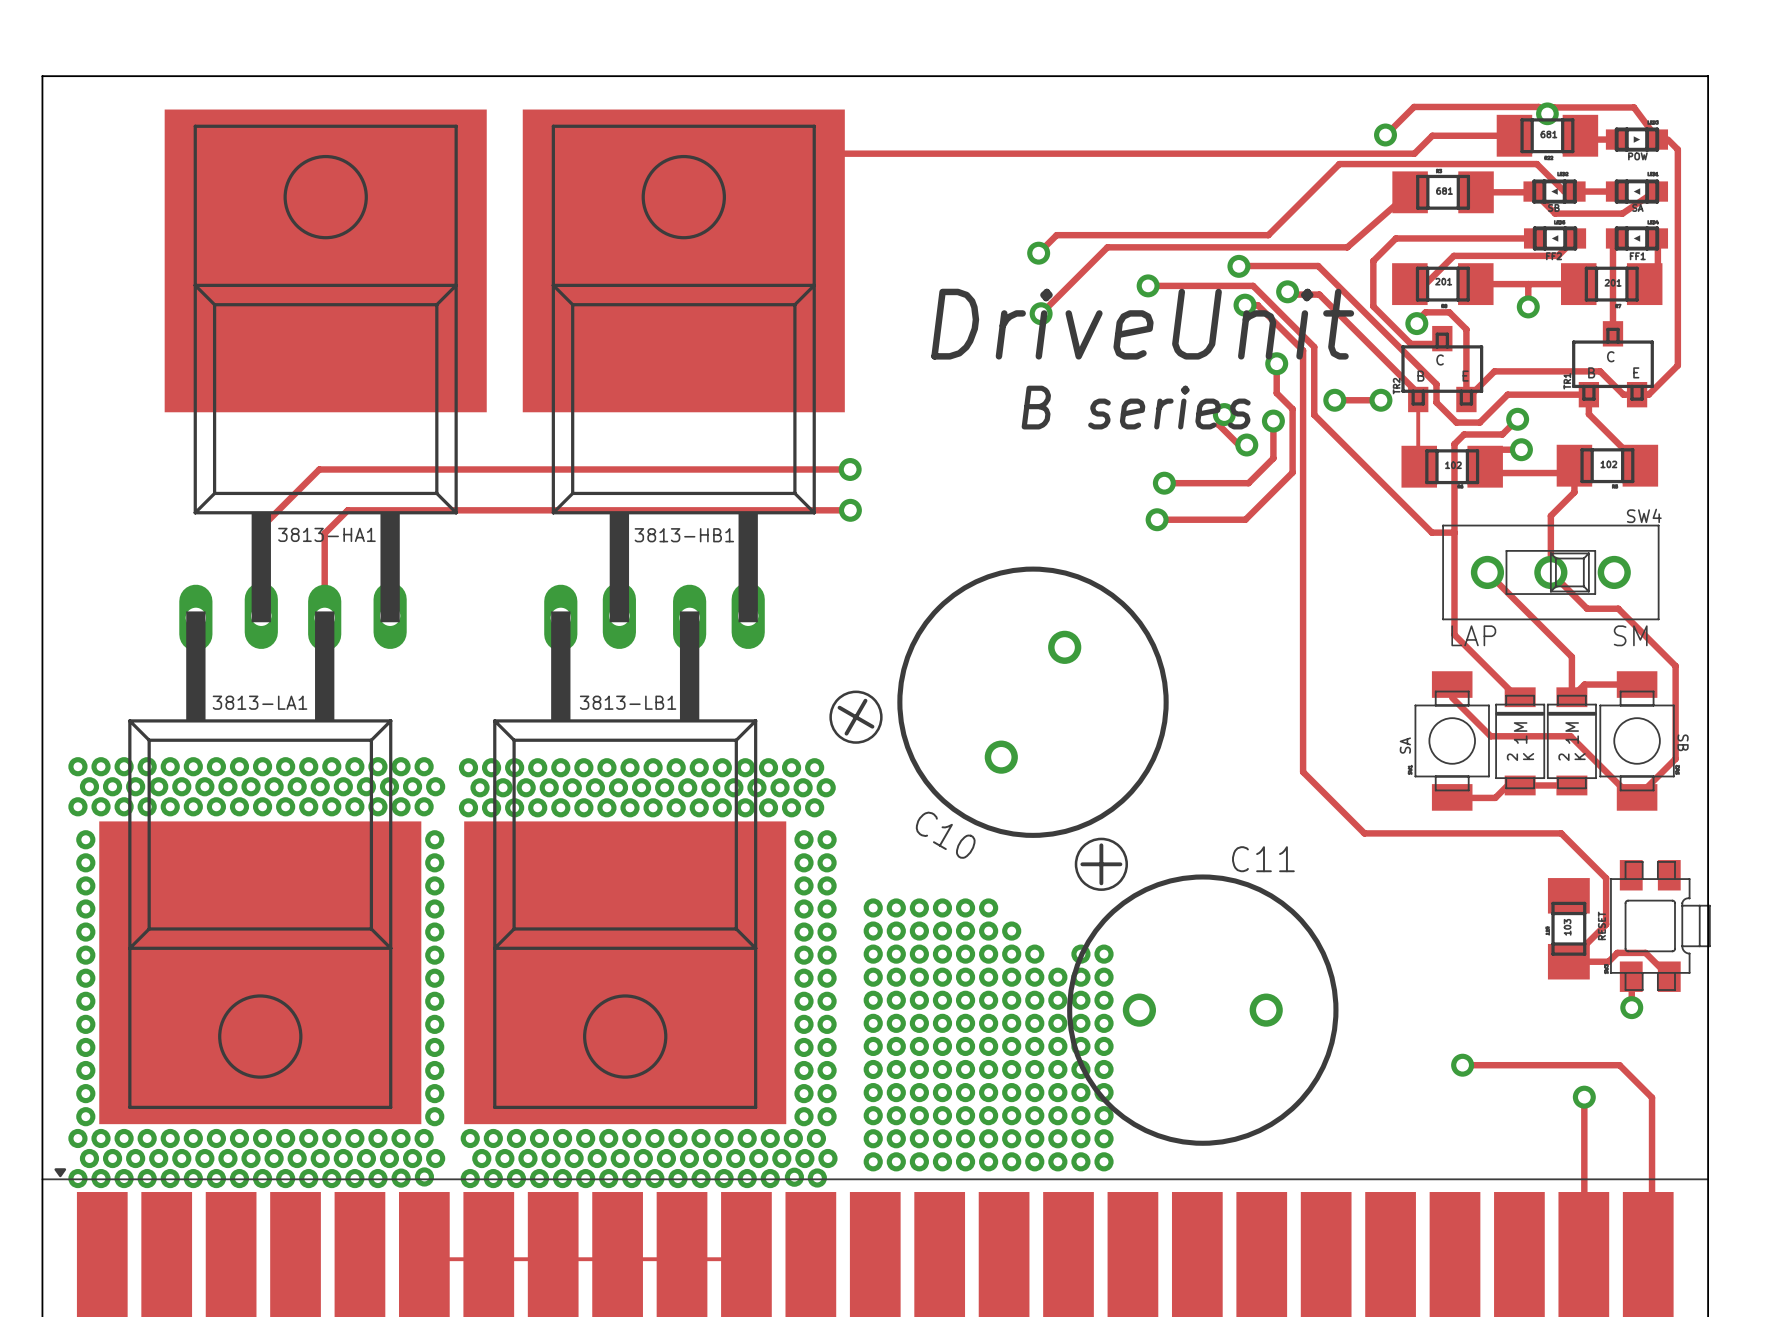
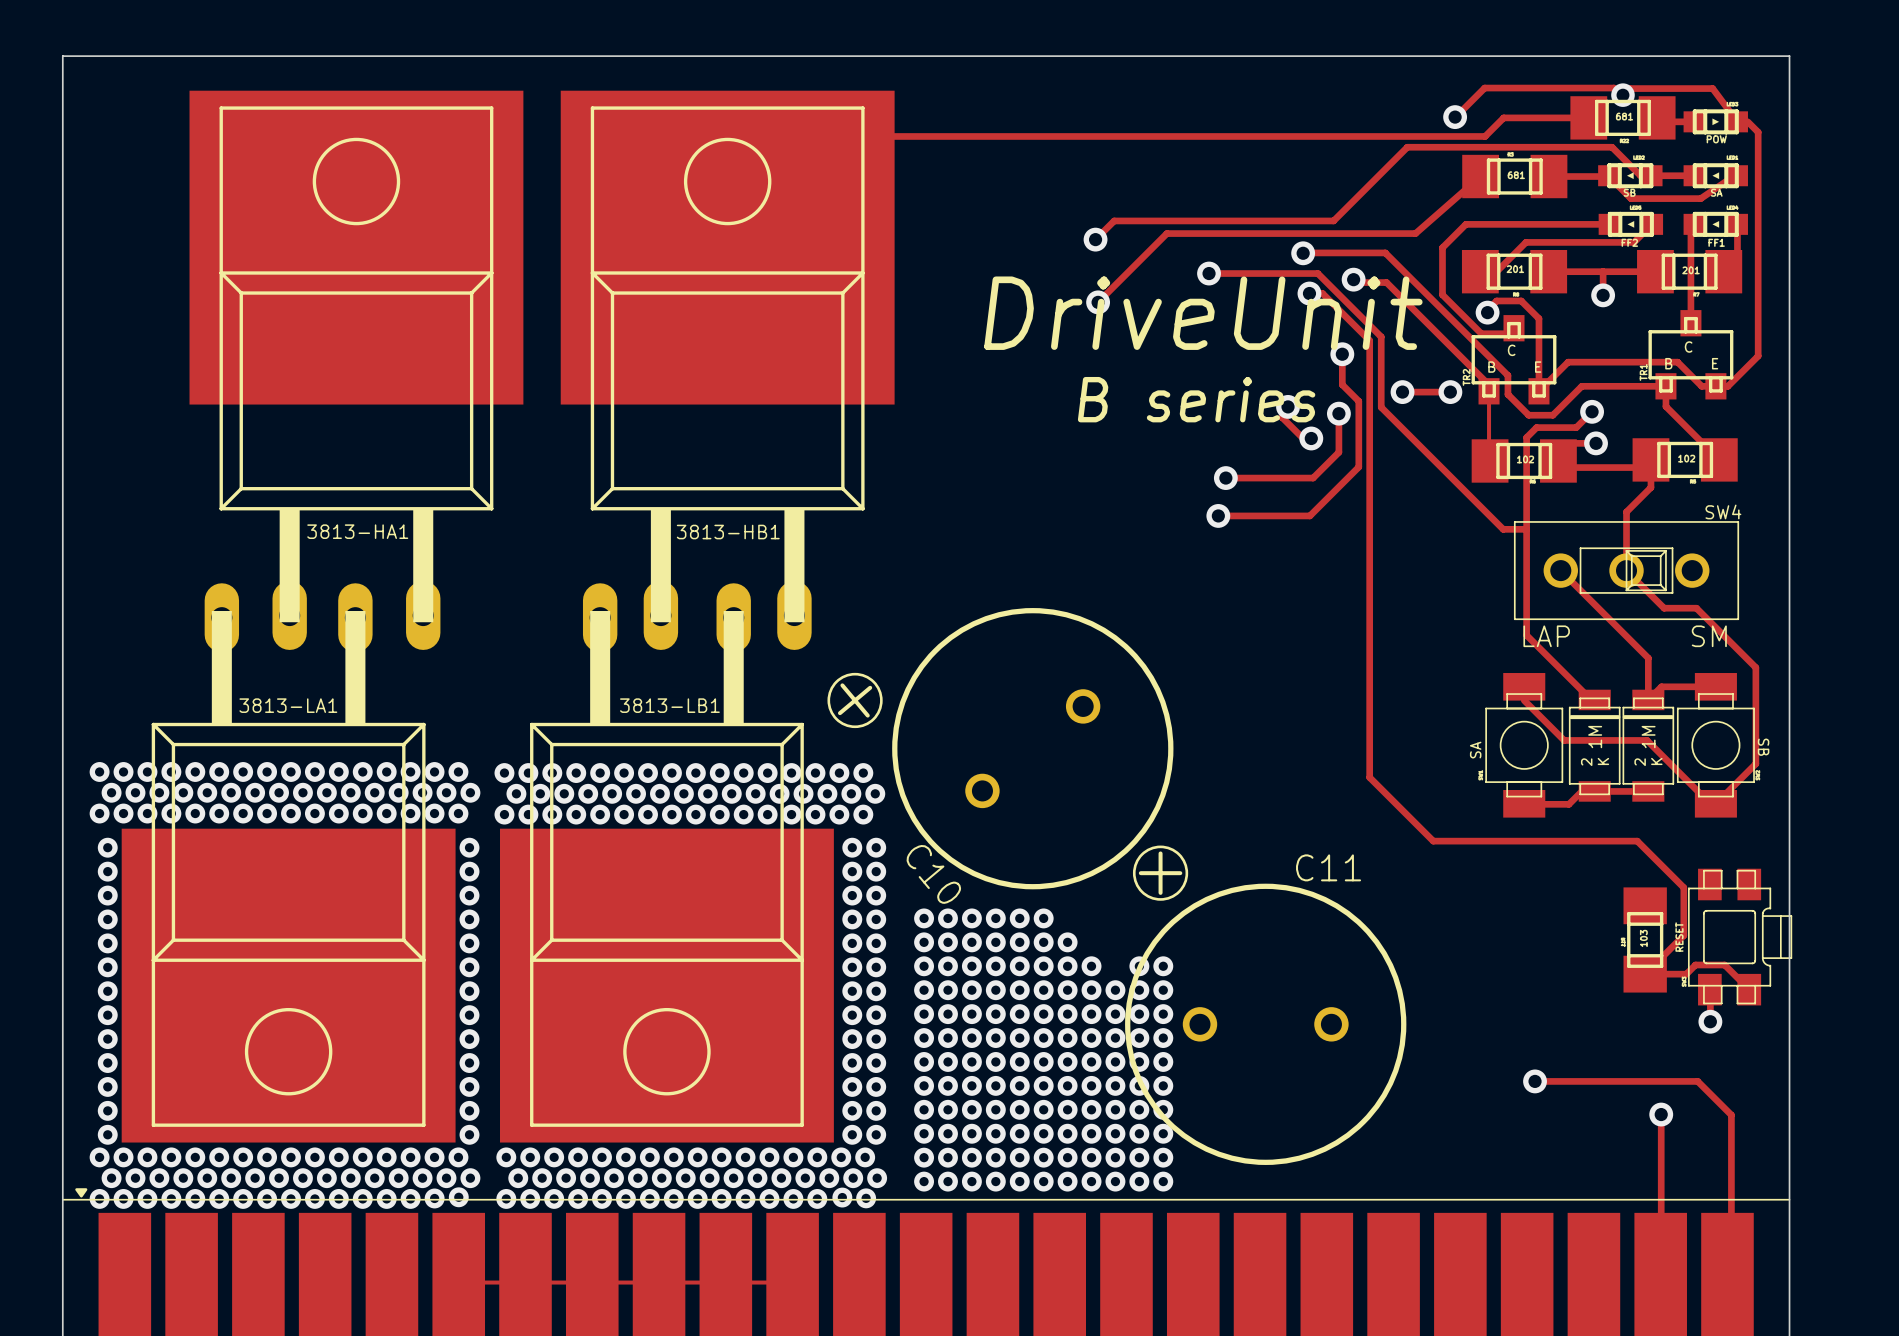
track: (850, 469) (319, 469) (261, 527) (261, 615) -> none
via: (850, 469) -> none
track: (850, 510) (347, 510) (324, 533) (324, 617) -> none
via: (850, 510) -> none
C10 footprint: [829, 566, 1169, 838] -> [827, 608, 1174, 890]

